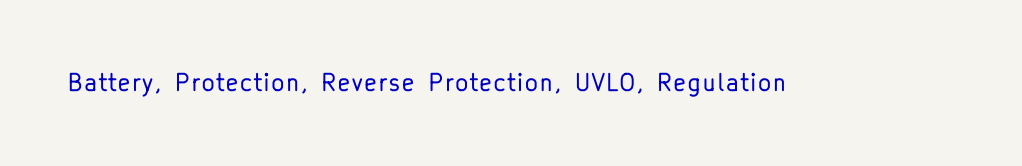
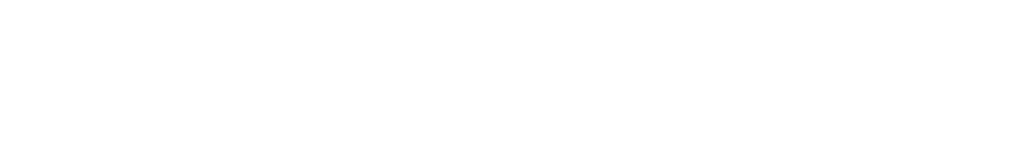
text: Battery, Protection, Reverse Protection, UVLO, Regulation (426, 84) -> none

